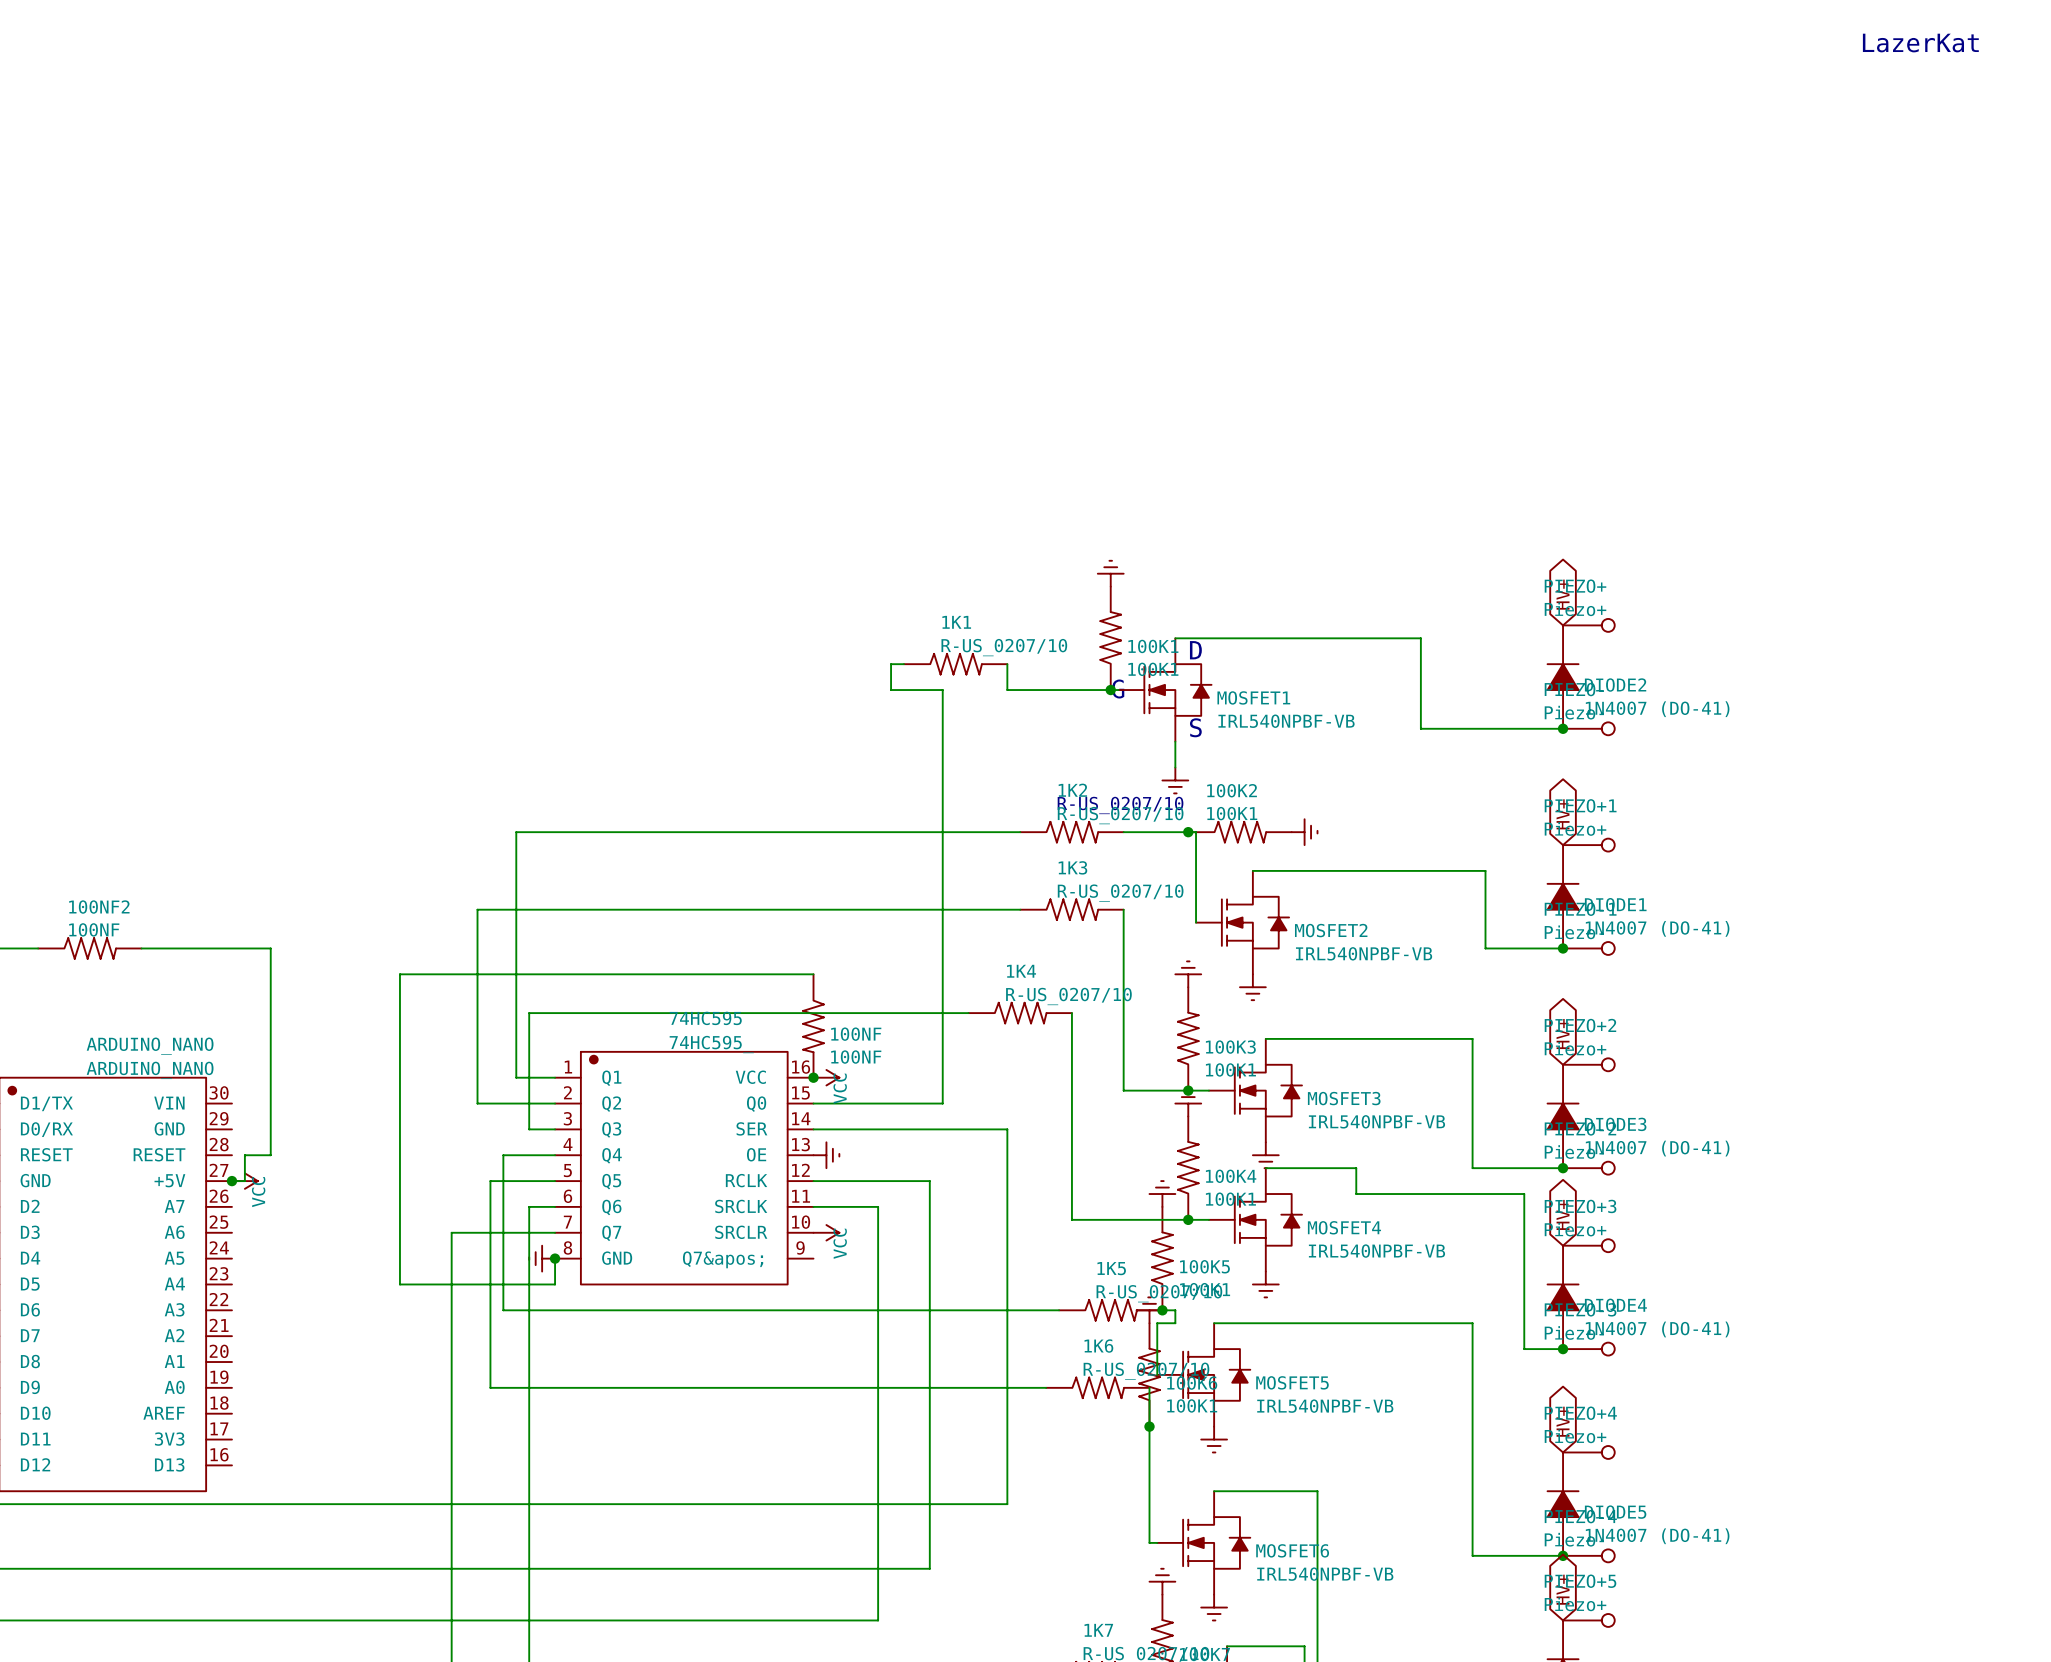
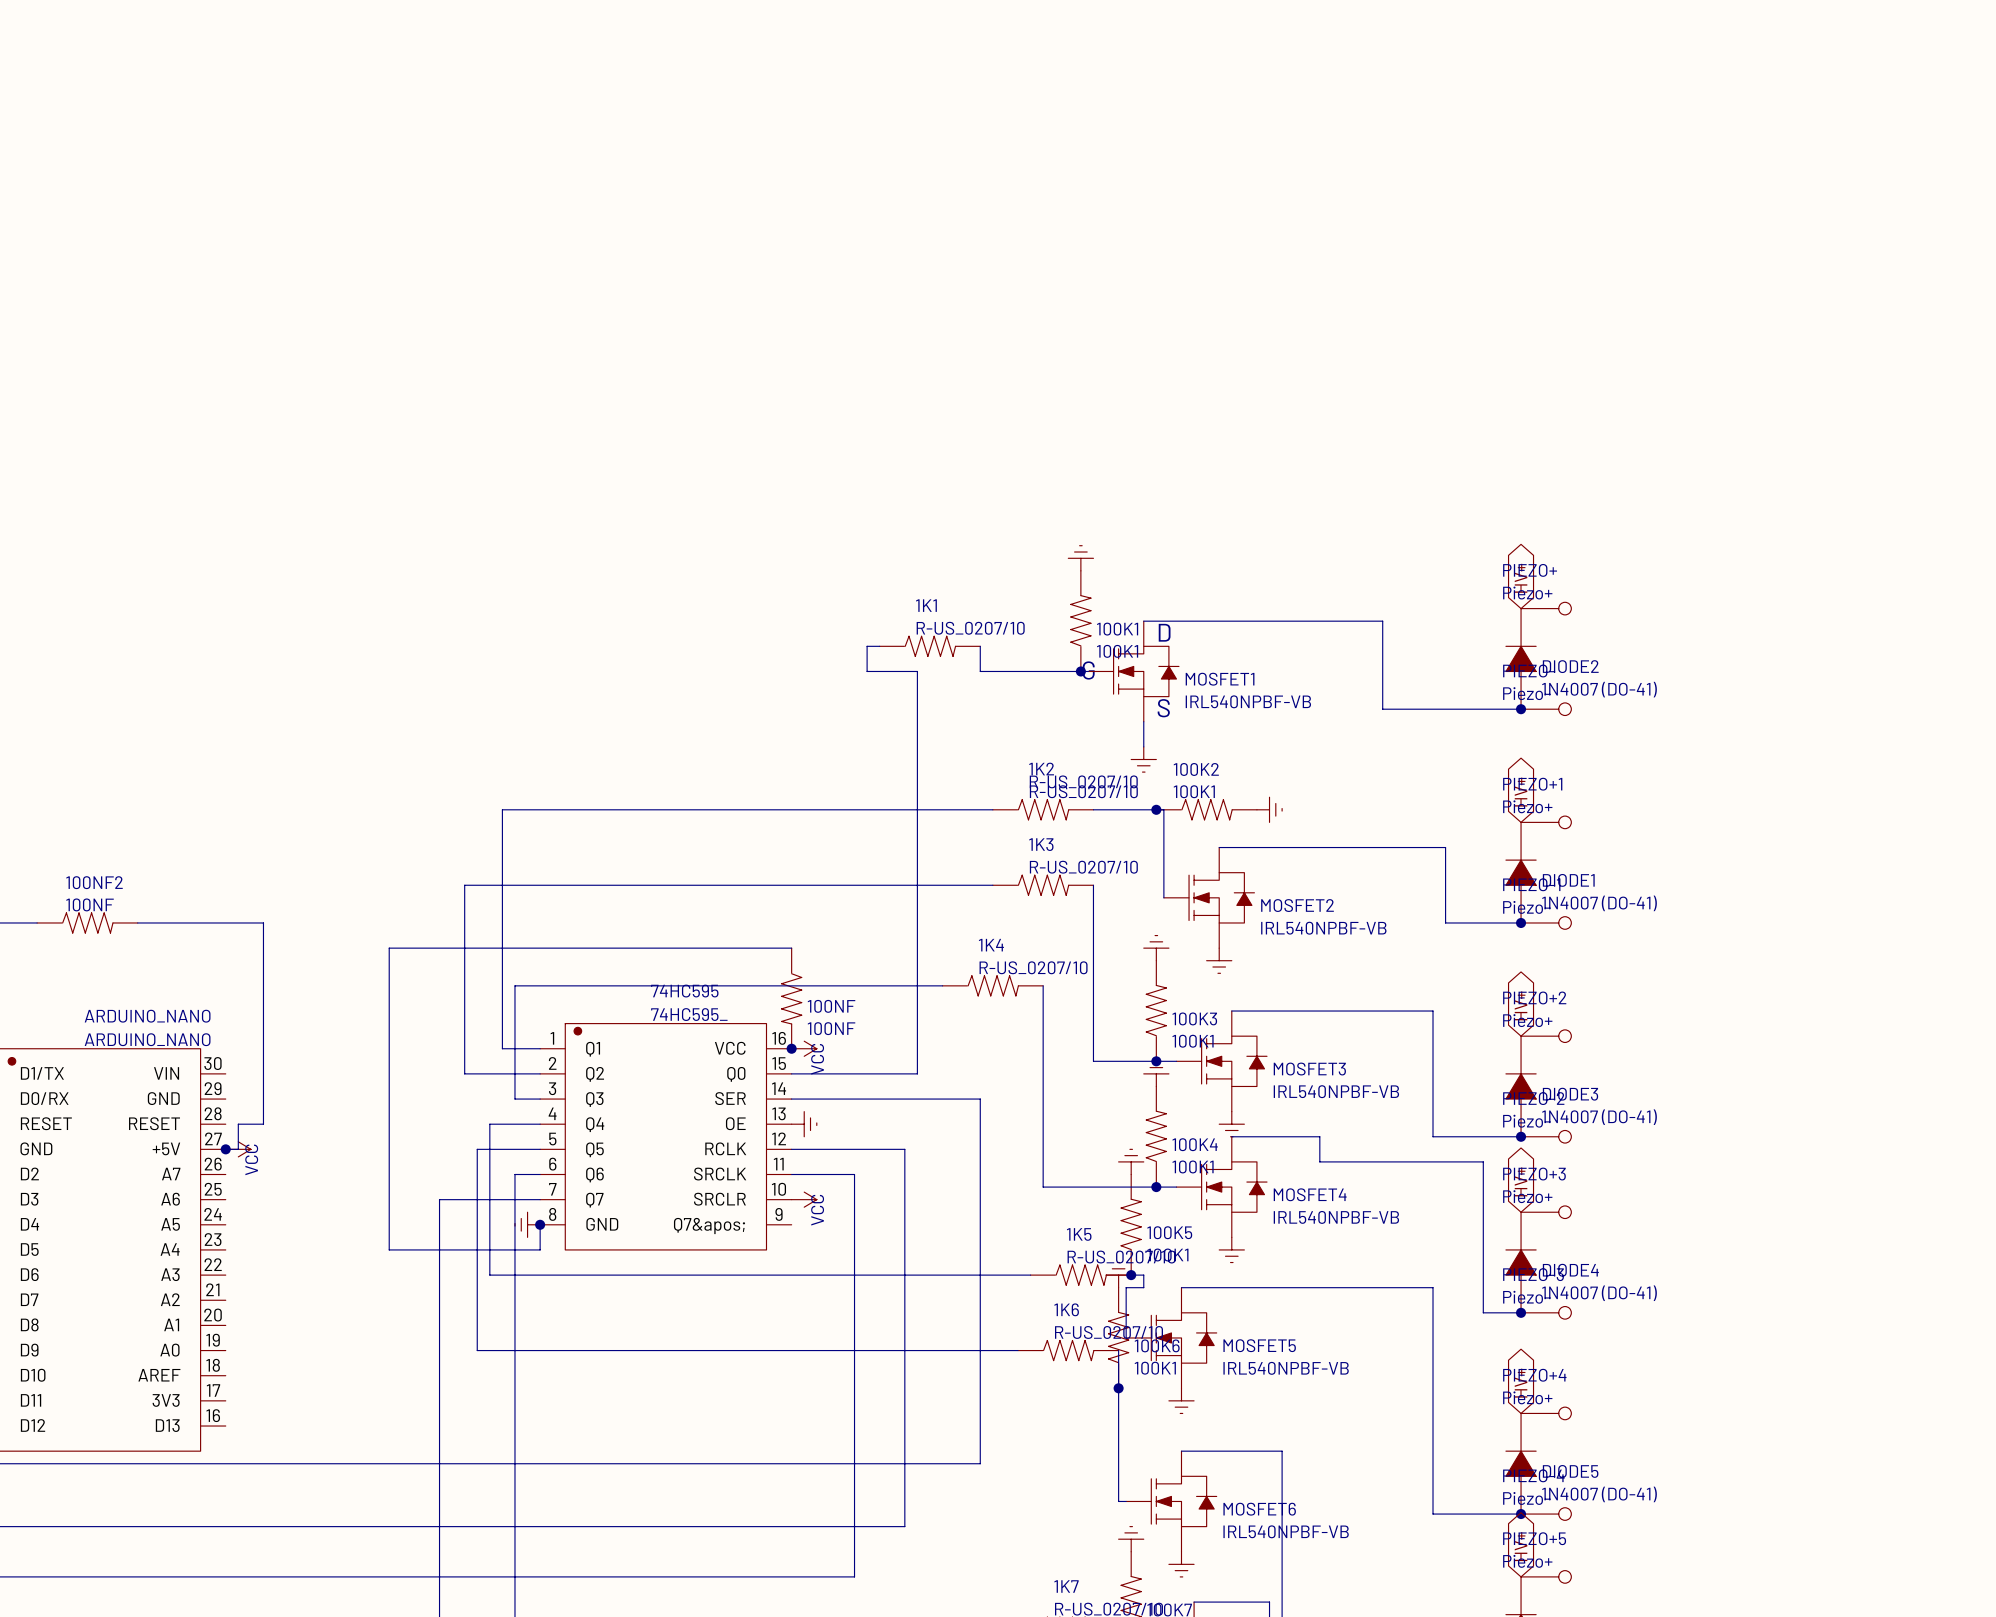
text: LazerKat (1920, 43) -> none

